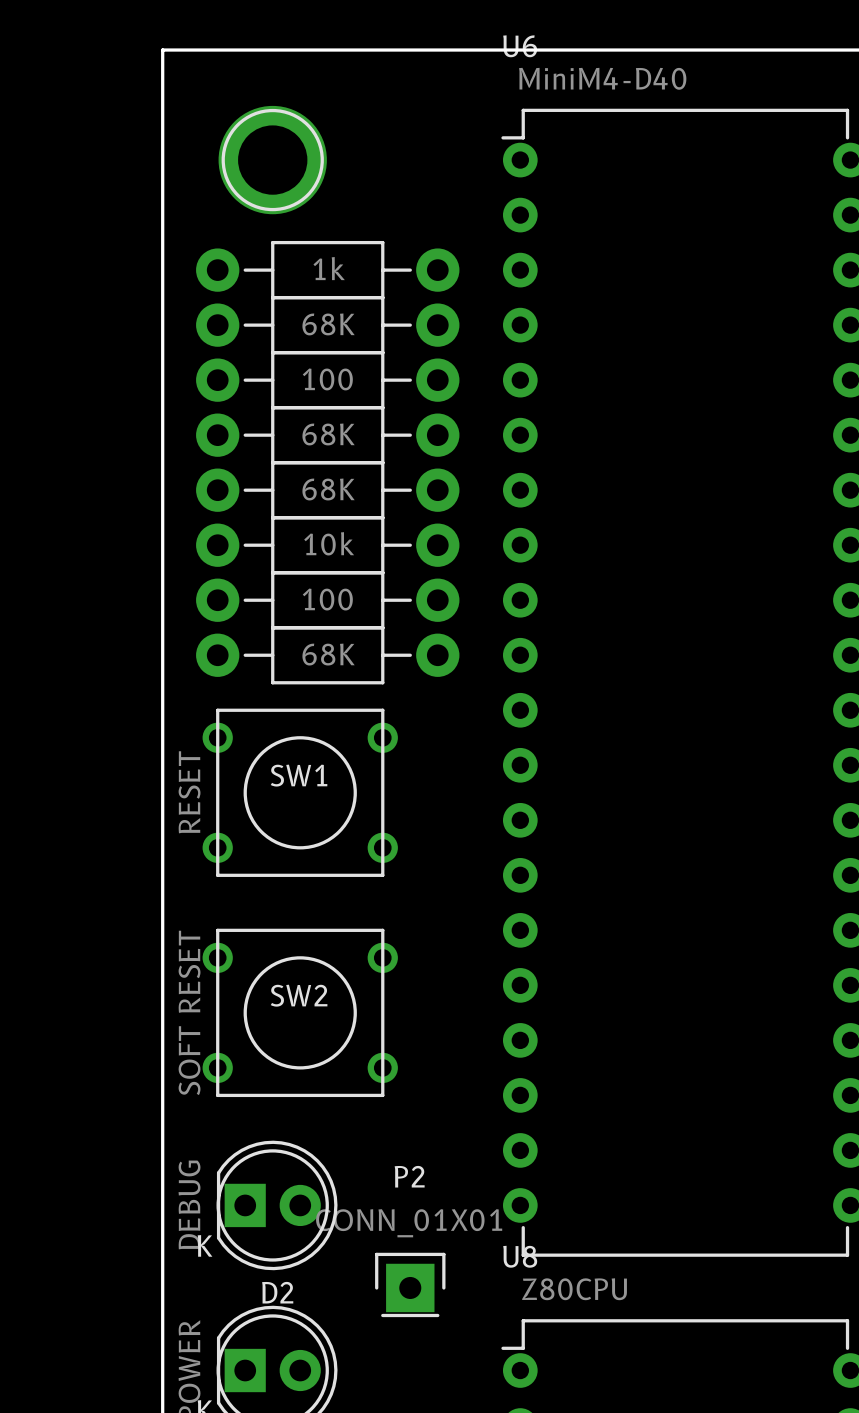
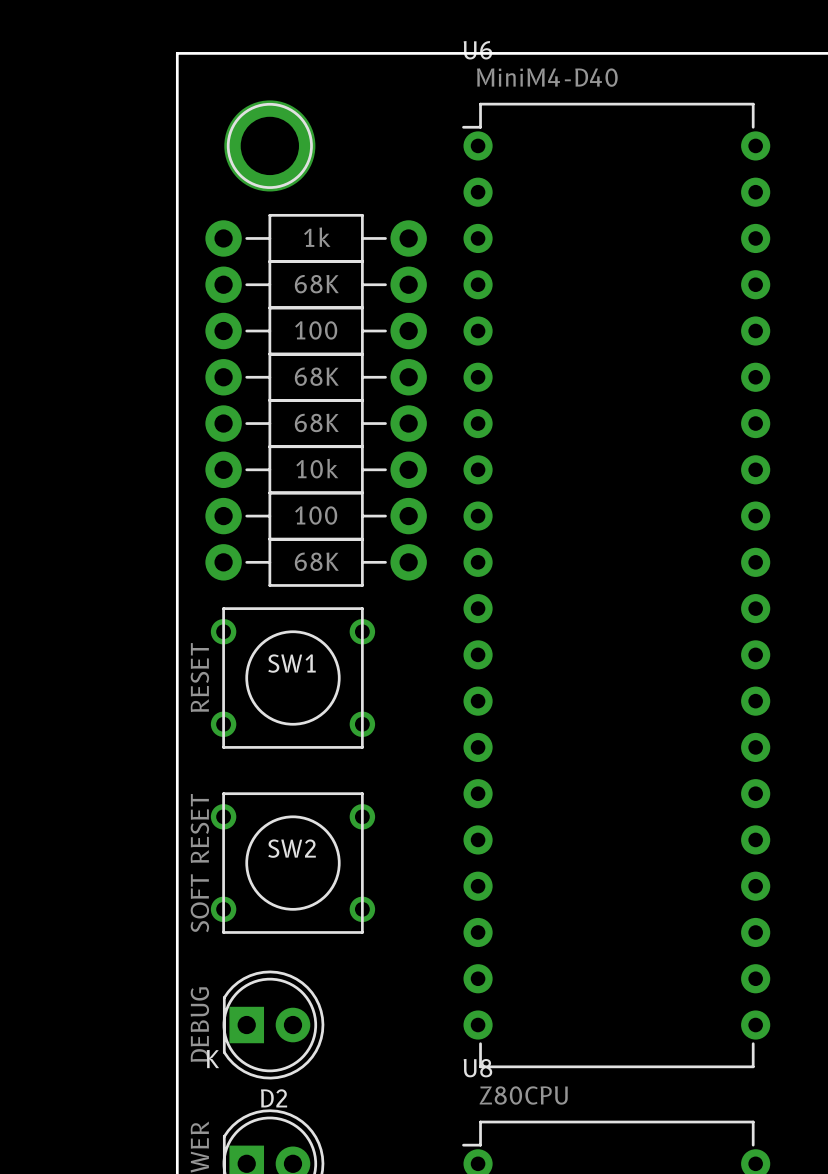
P2: CONN_01X01 (410, 1284) -> none

